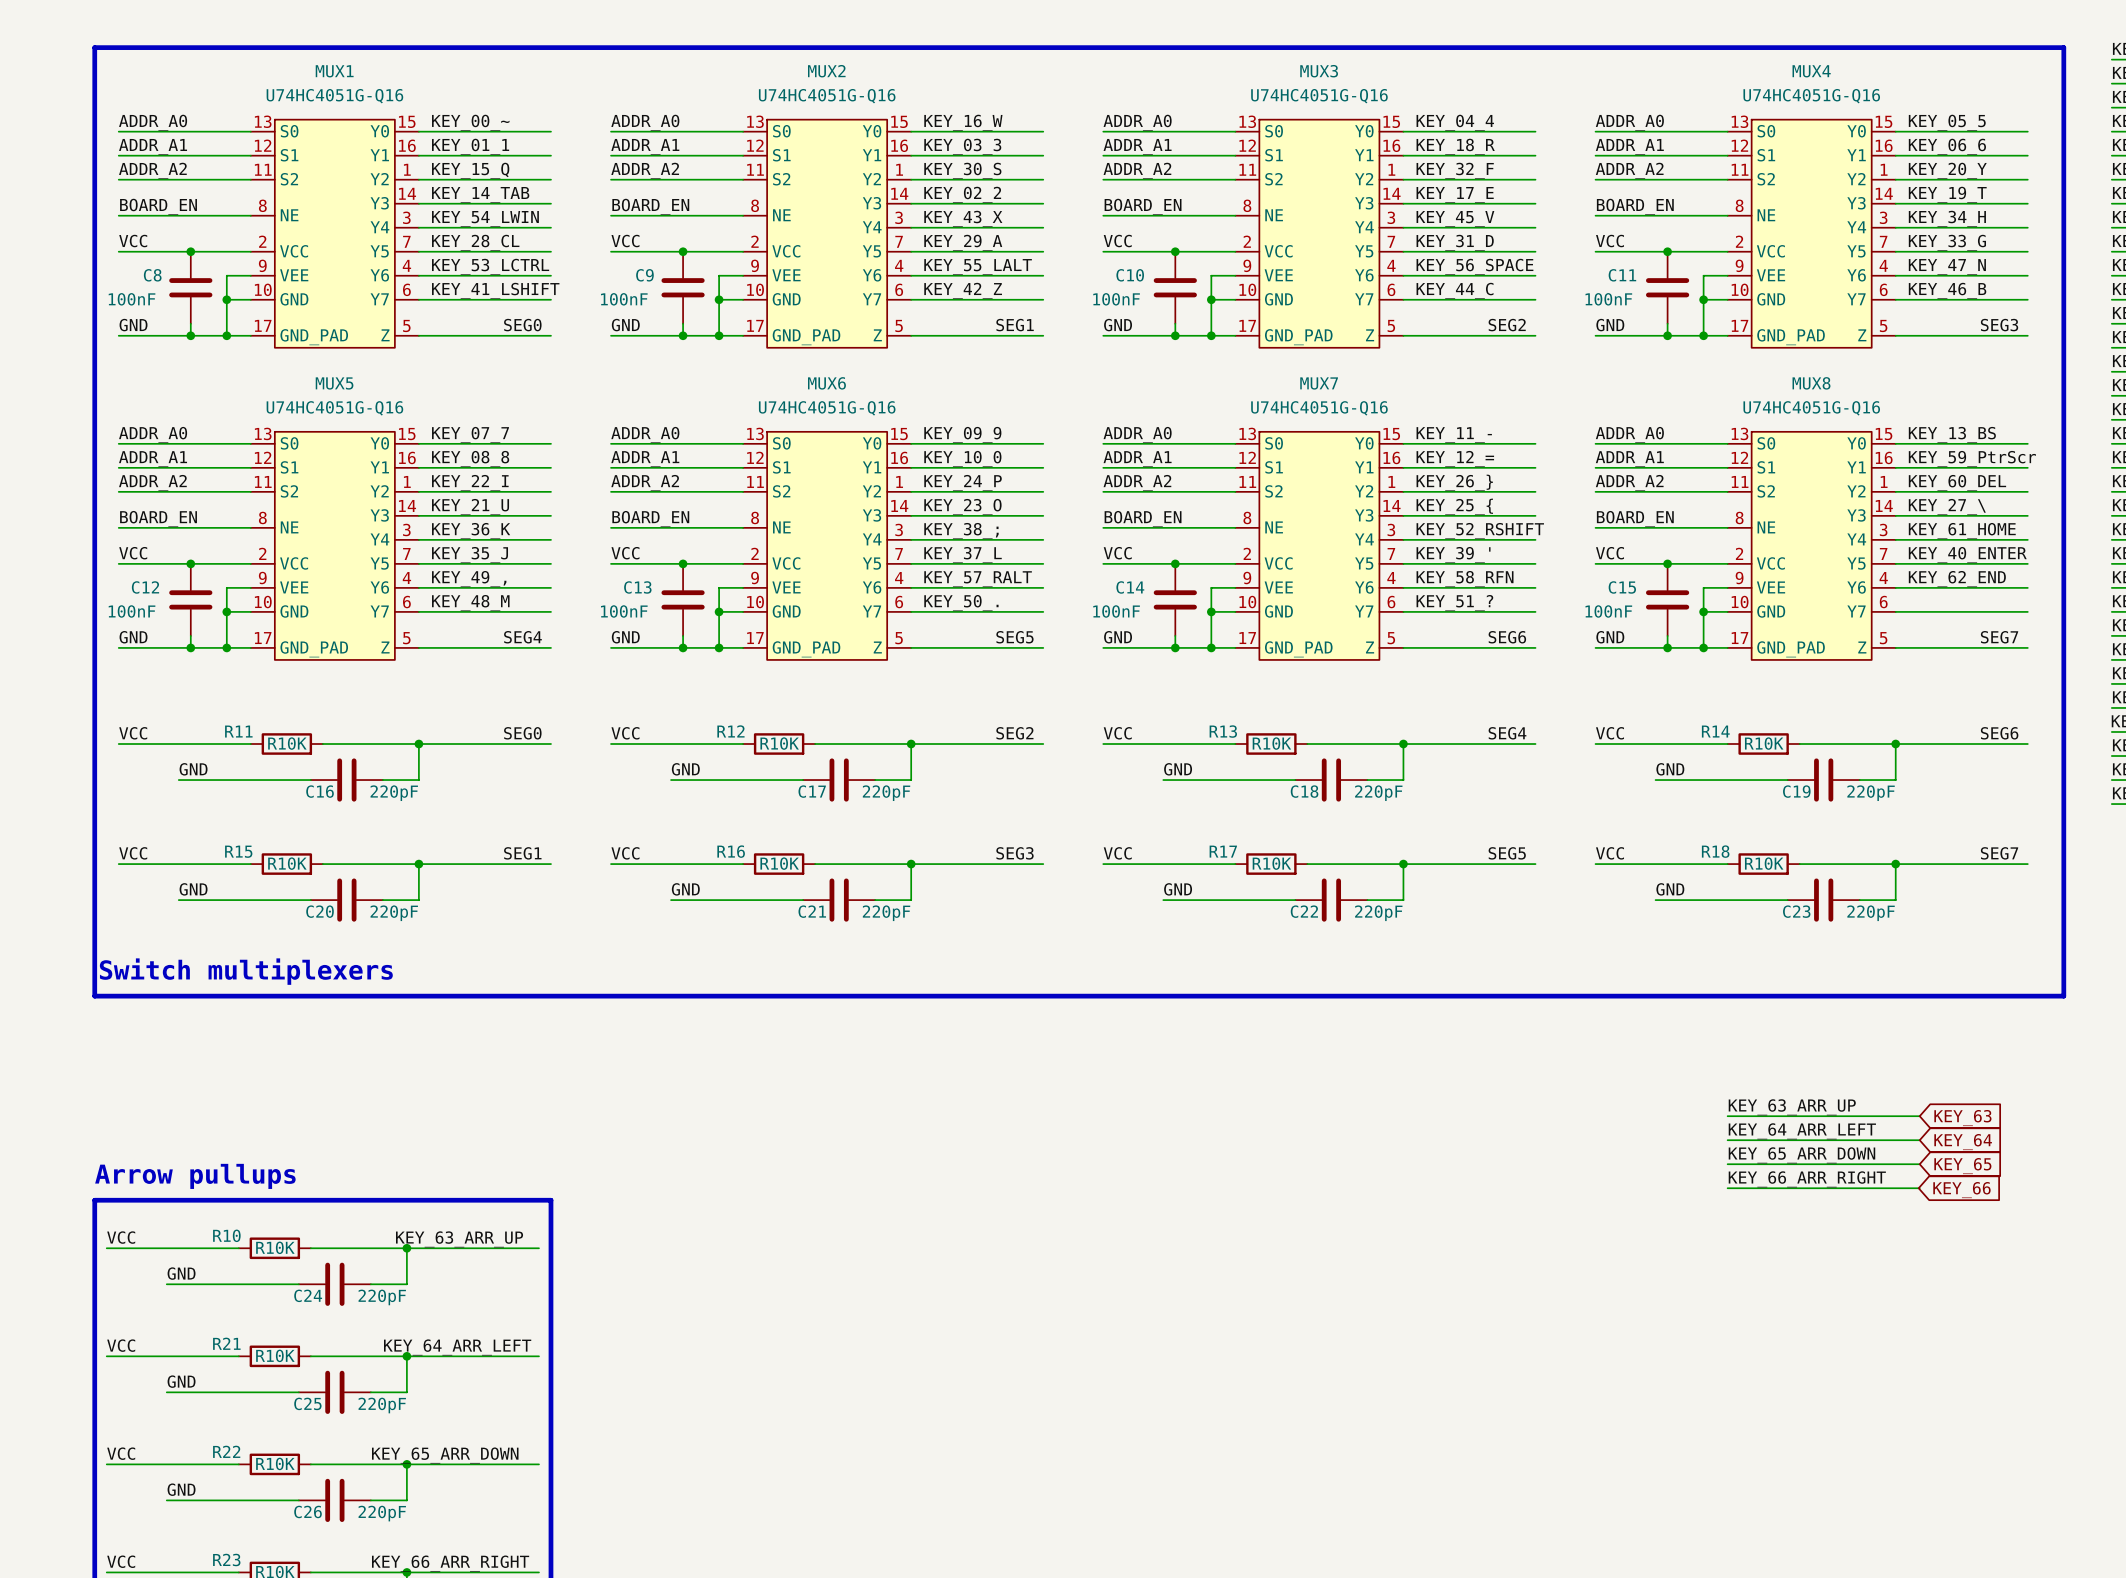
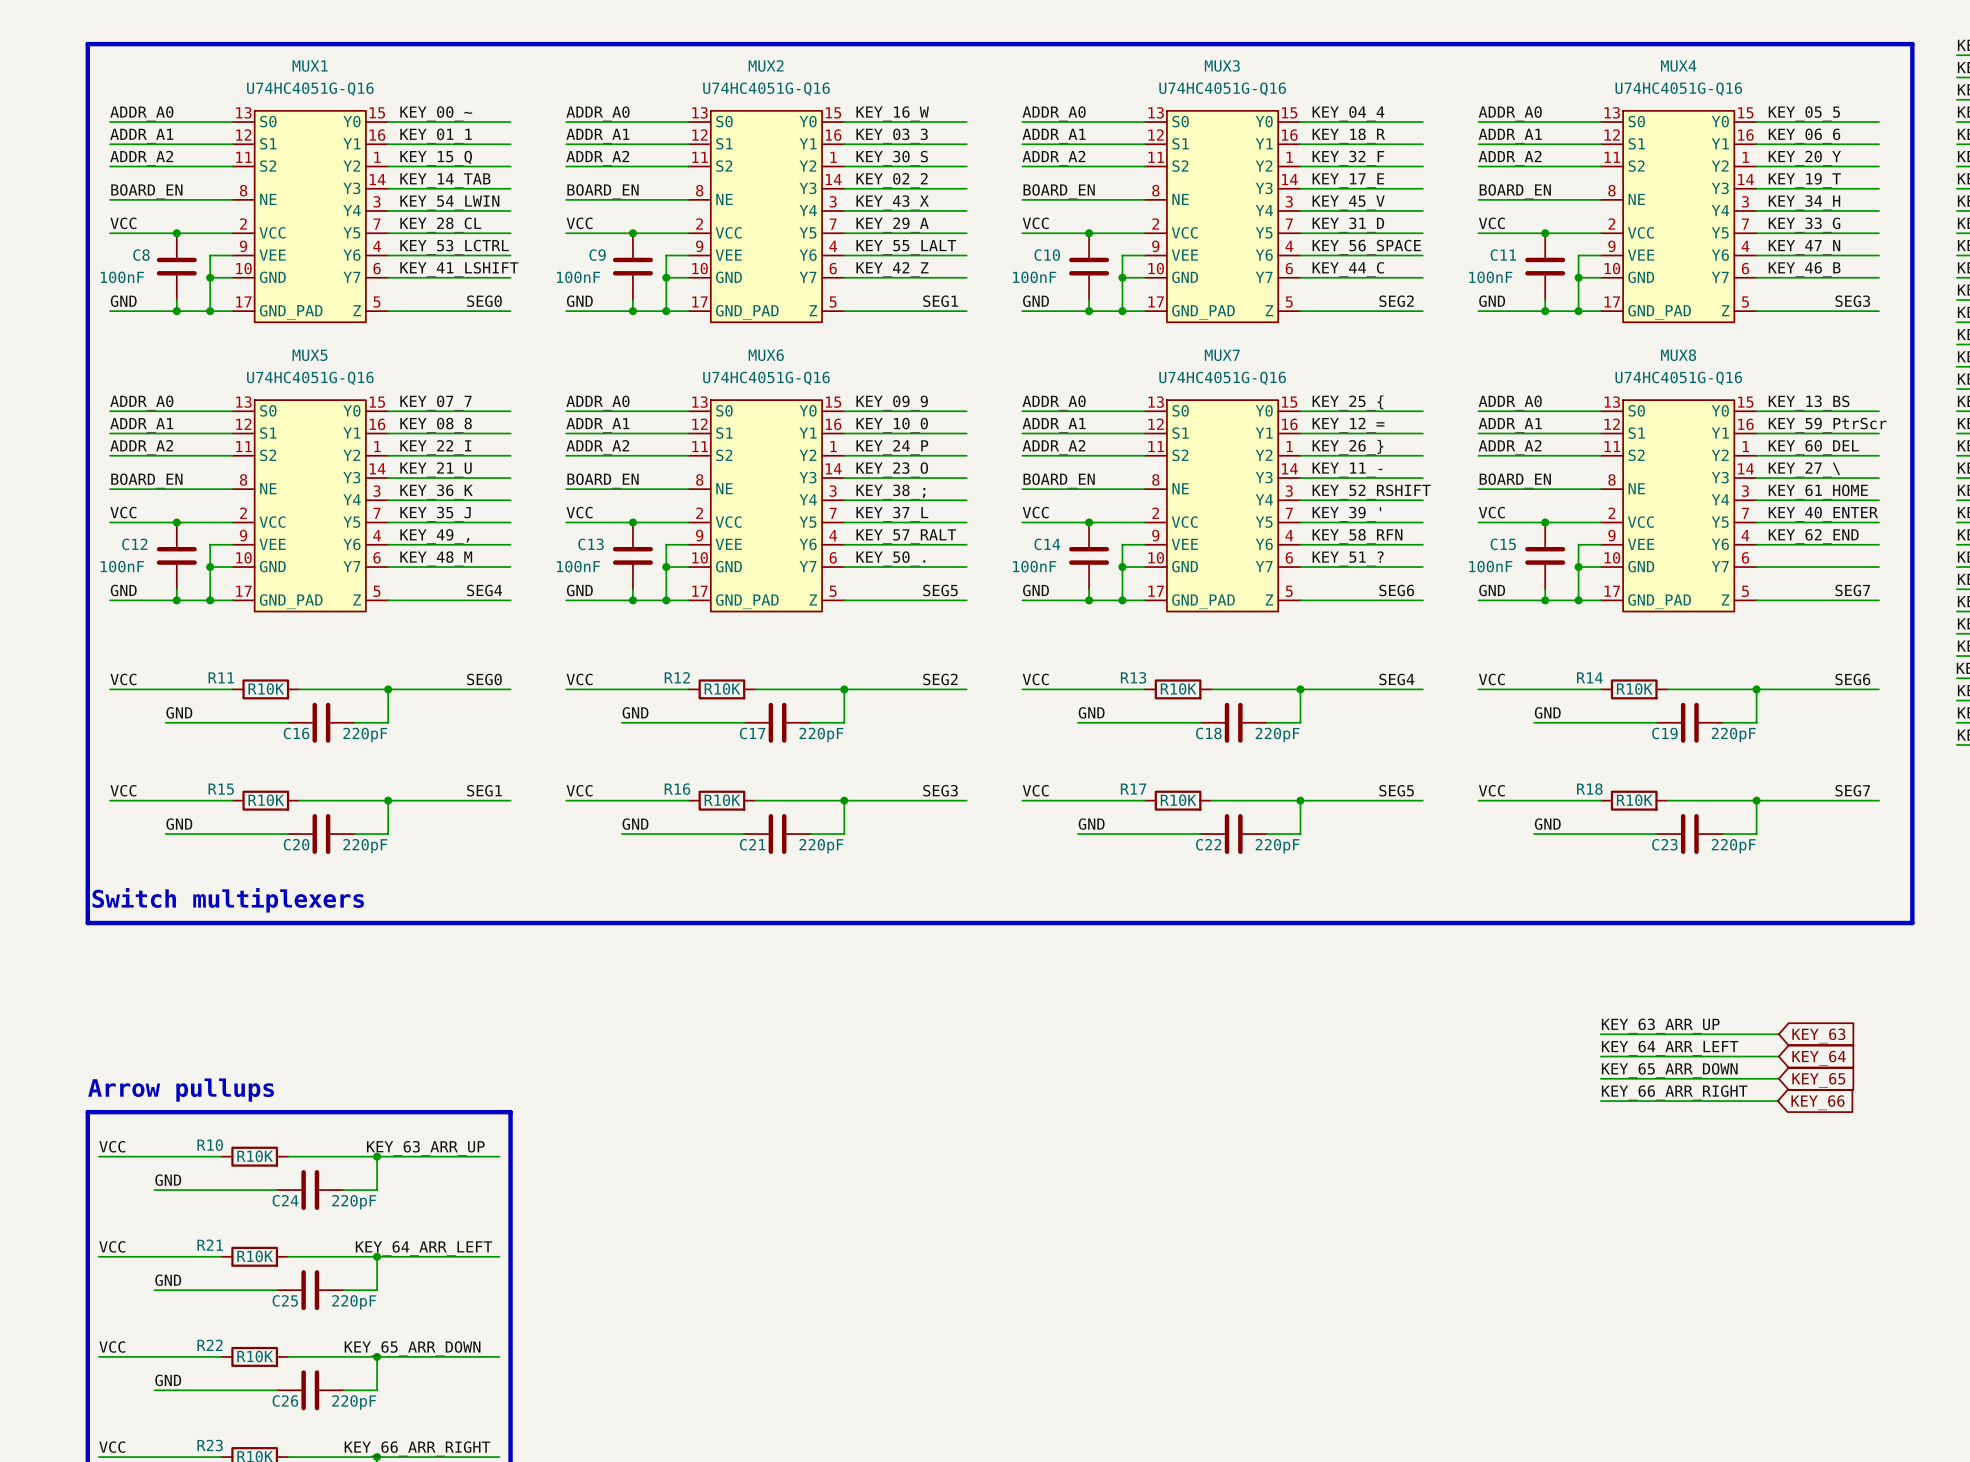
label: KEY_11_- (1454, 435) -> KEY_25_{ (1348, 402)
label: KEY_25_{ (1454, 506) -> KEY_11_- (1347, 469)

